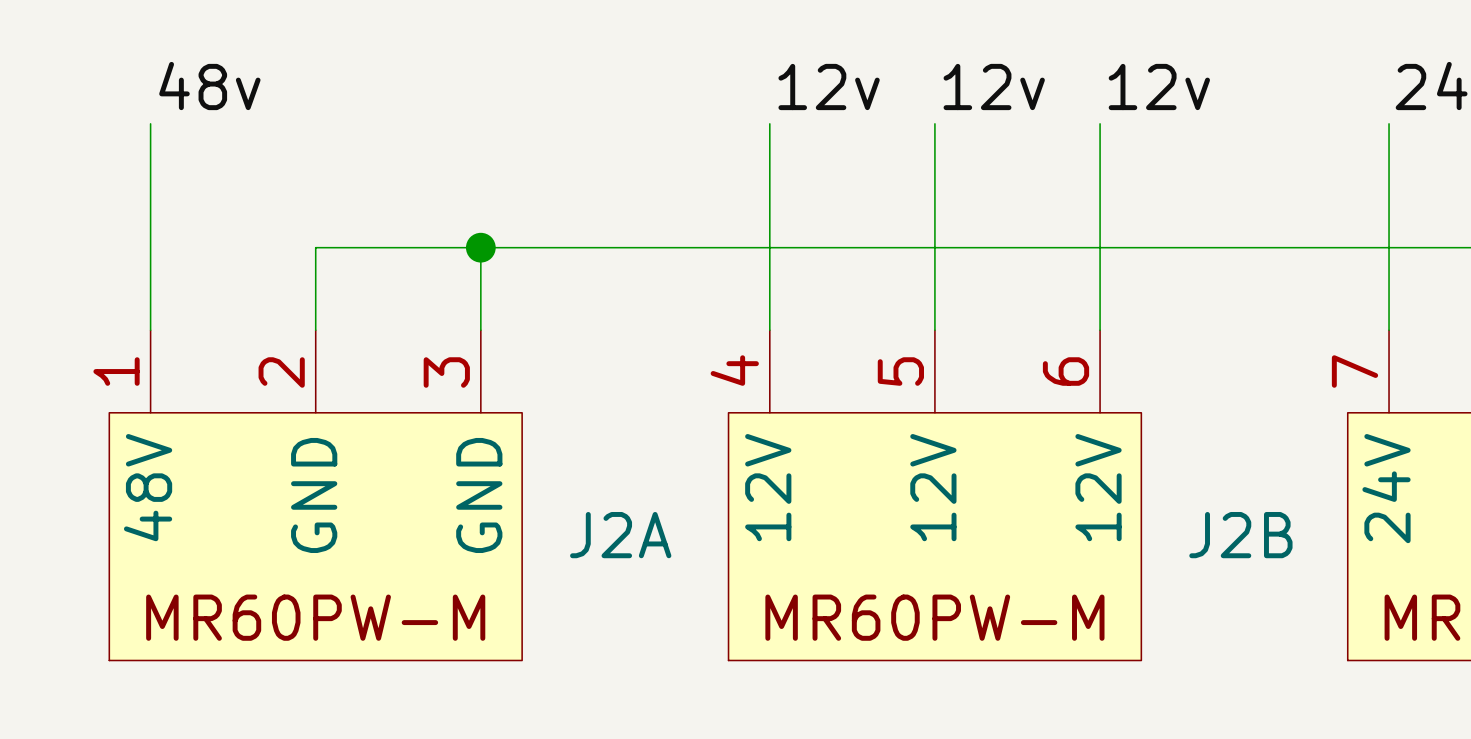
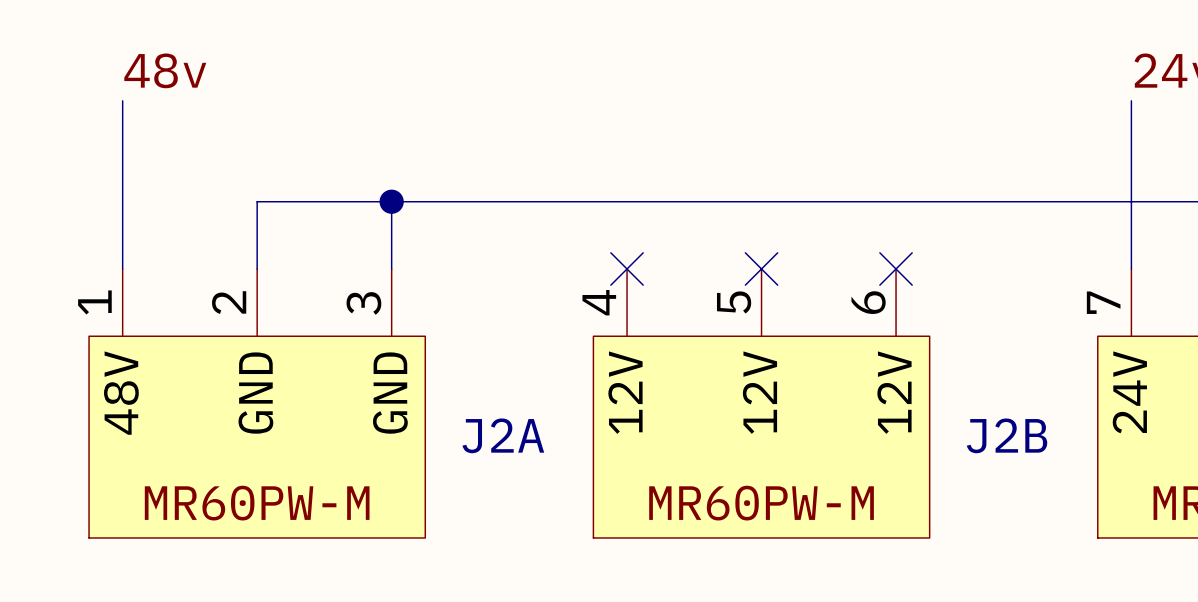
label: 12v (829, 87) -> none
label: 12v (994, 87) -> none
label: 12v (1159, 87) -> none
wire: (769, 123) (769, 330) -> none
wire: (934, 123) (934, 330) -> none
wire: (1100, 123) (1100, 330) -> none
no-connect mark: none -> (627, 268)
no-connect mark: none -> (761, 268)
no-connect mark: none -> (896, 268)

